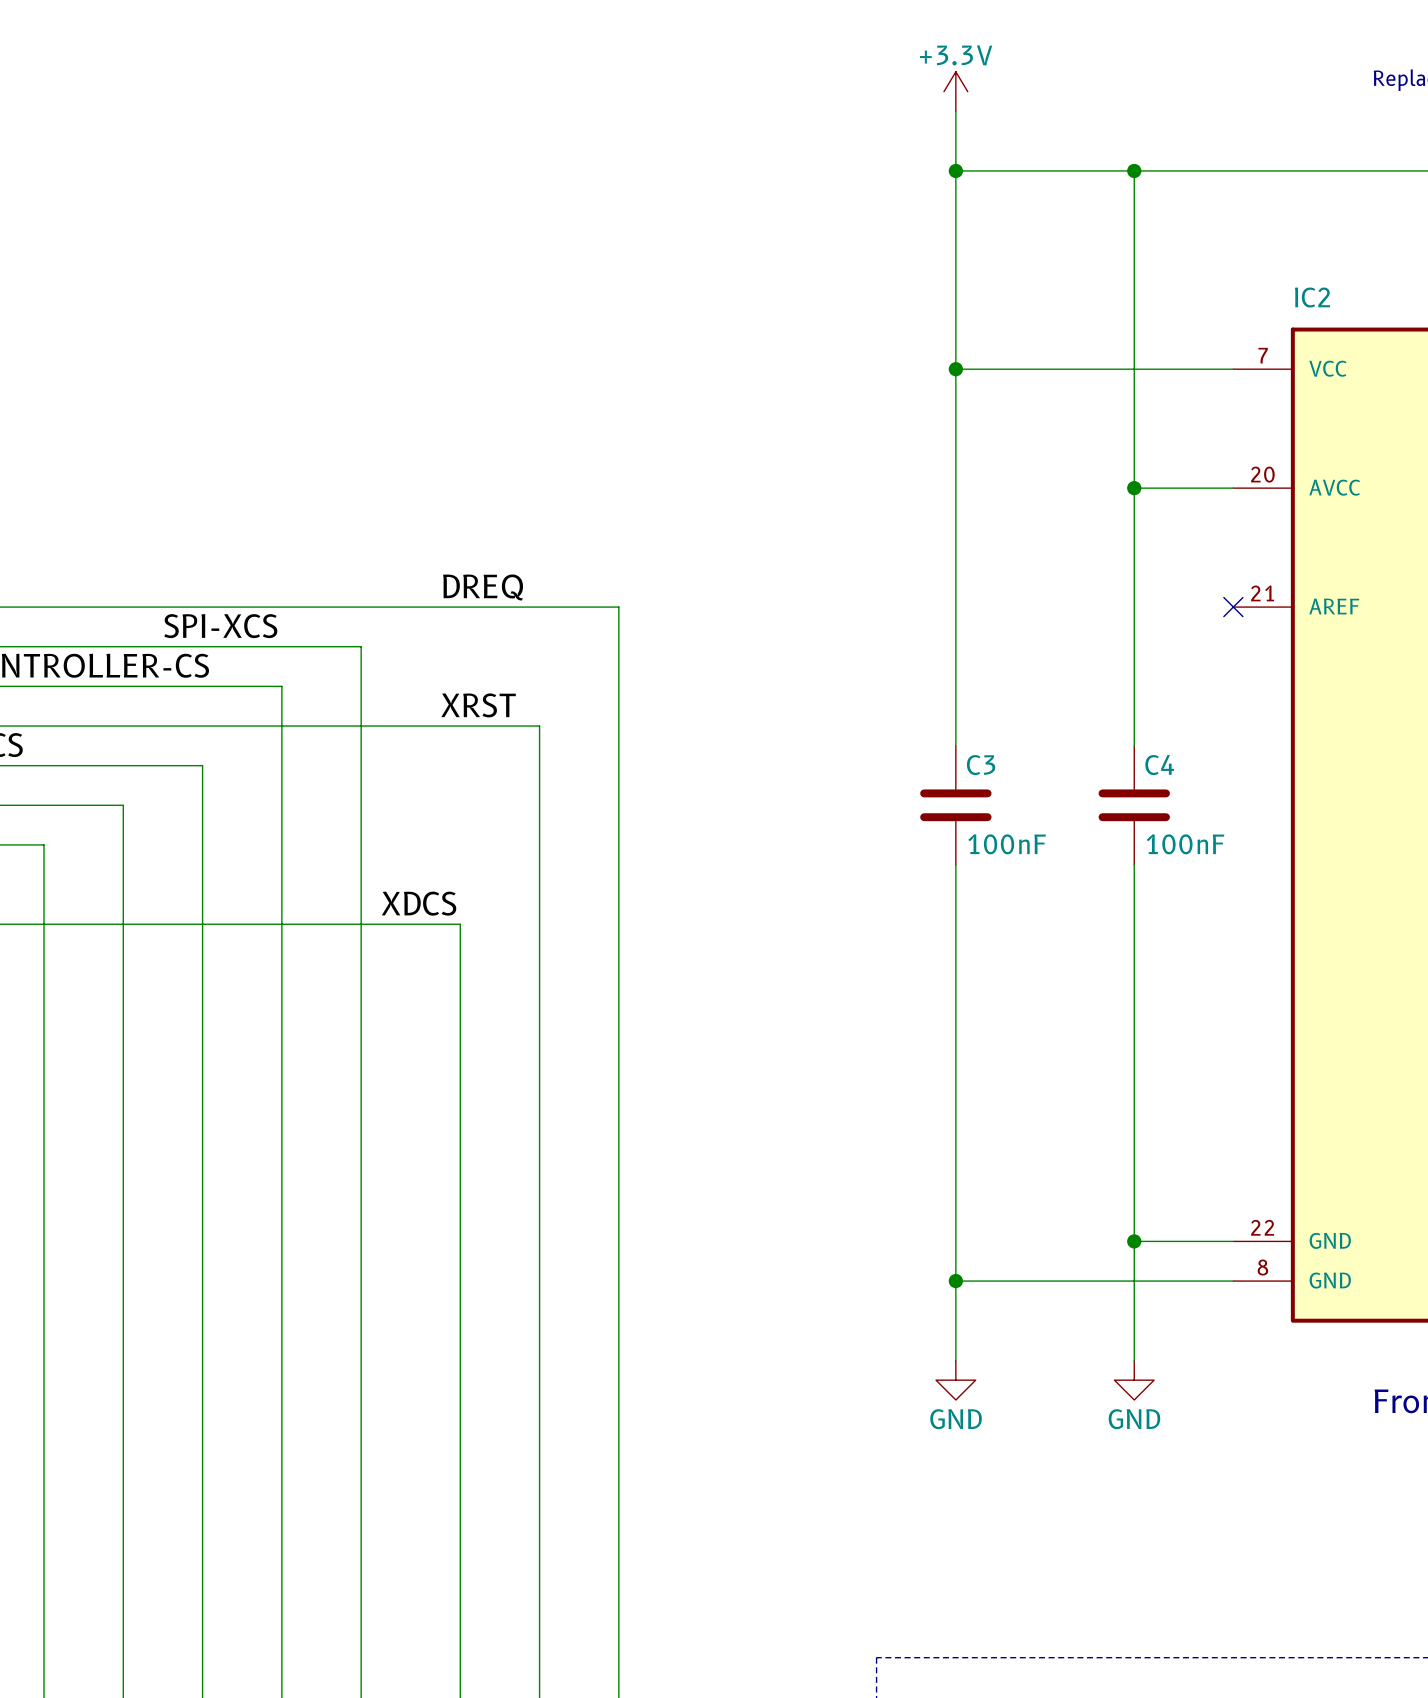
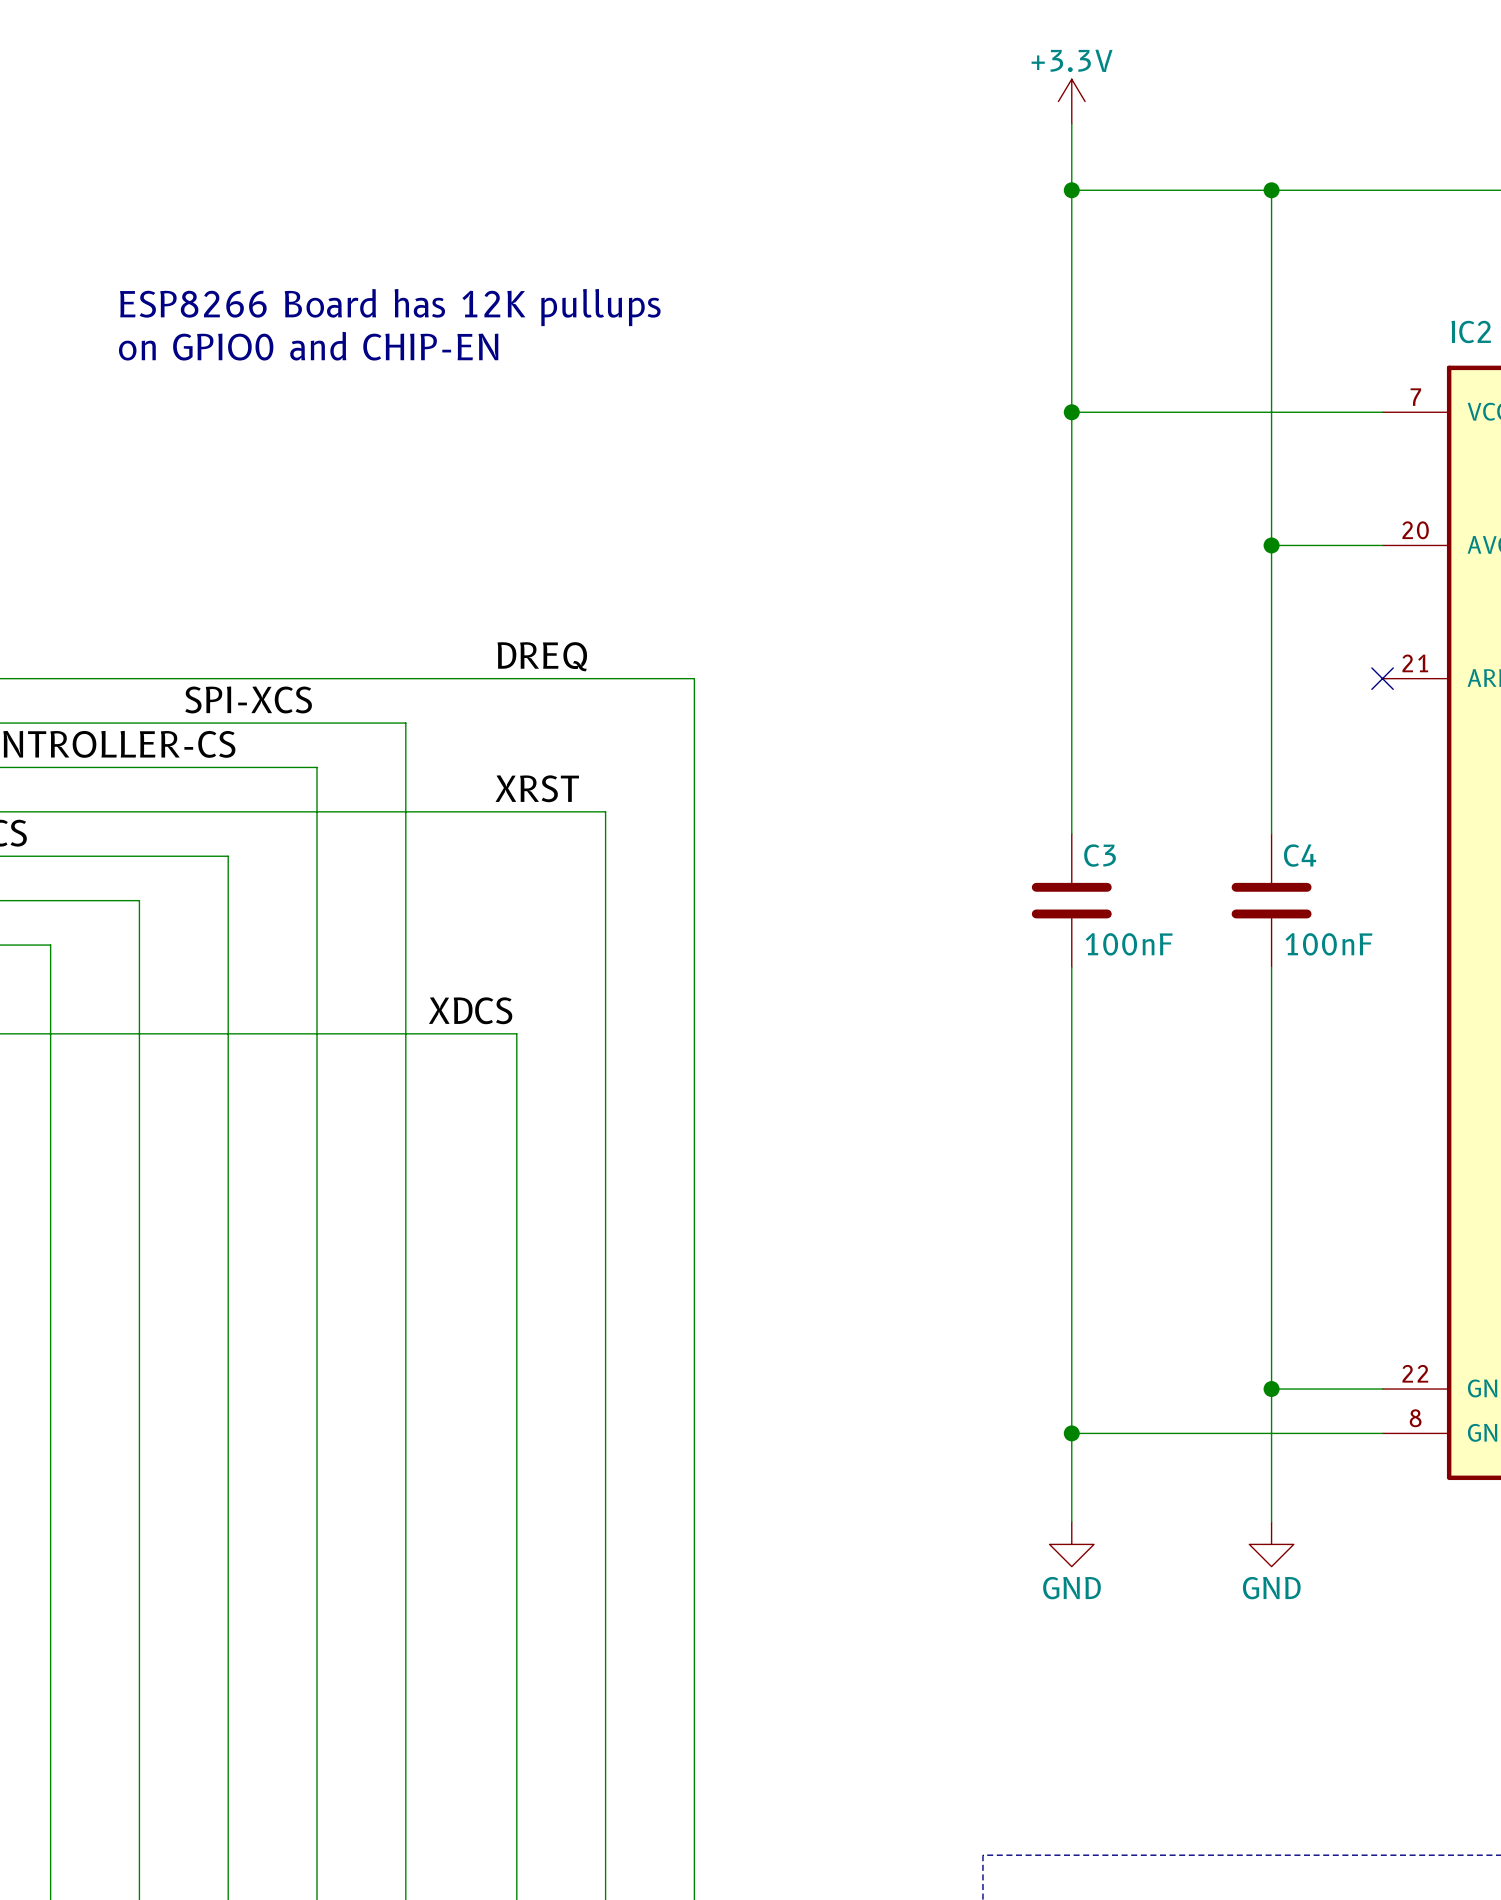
text: none -> ESP8266 Board has 12K pullups (390, 307)
text: none -> on GPIO0 and CHIP-EN (308, 346)

